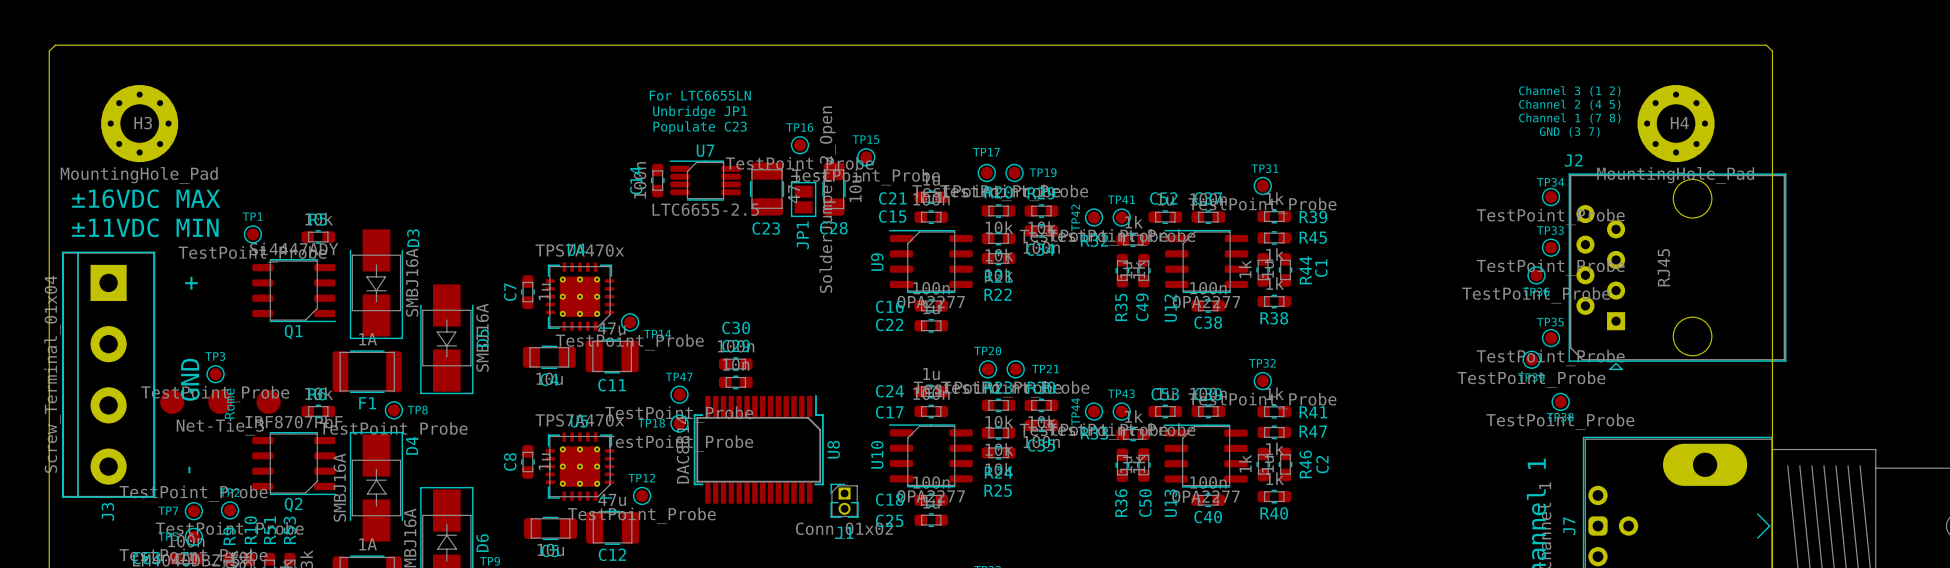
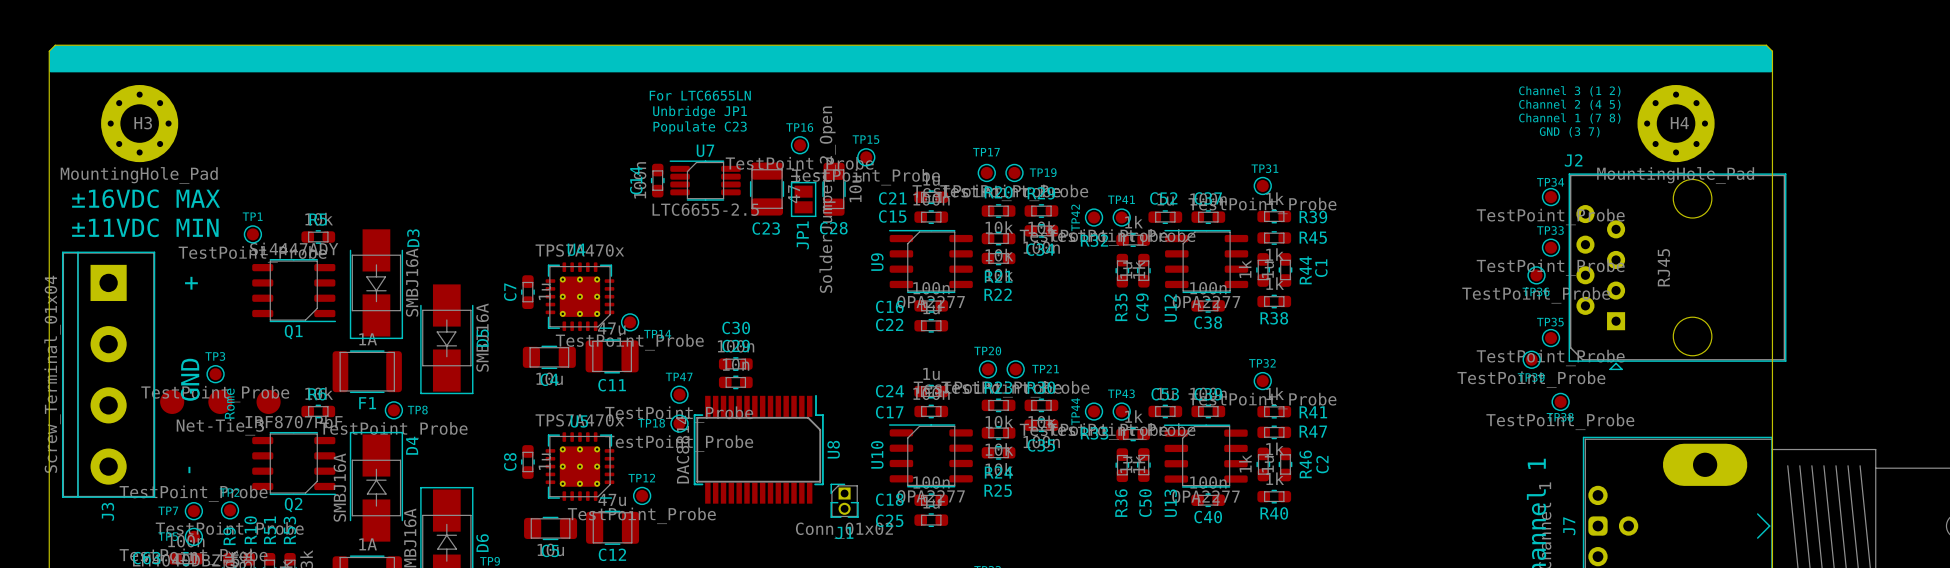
drawing: none -> [49, 45, 1773, 73]

